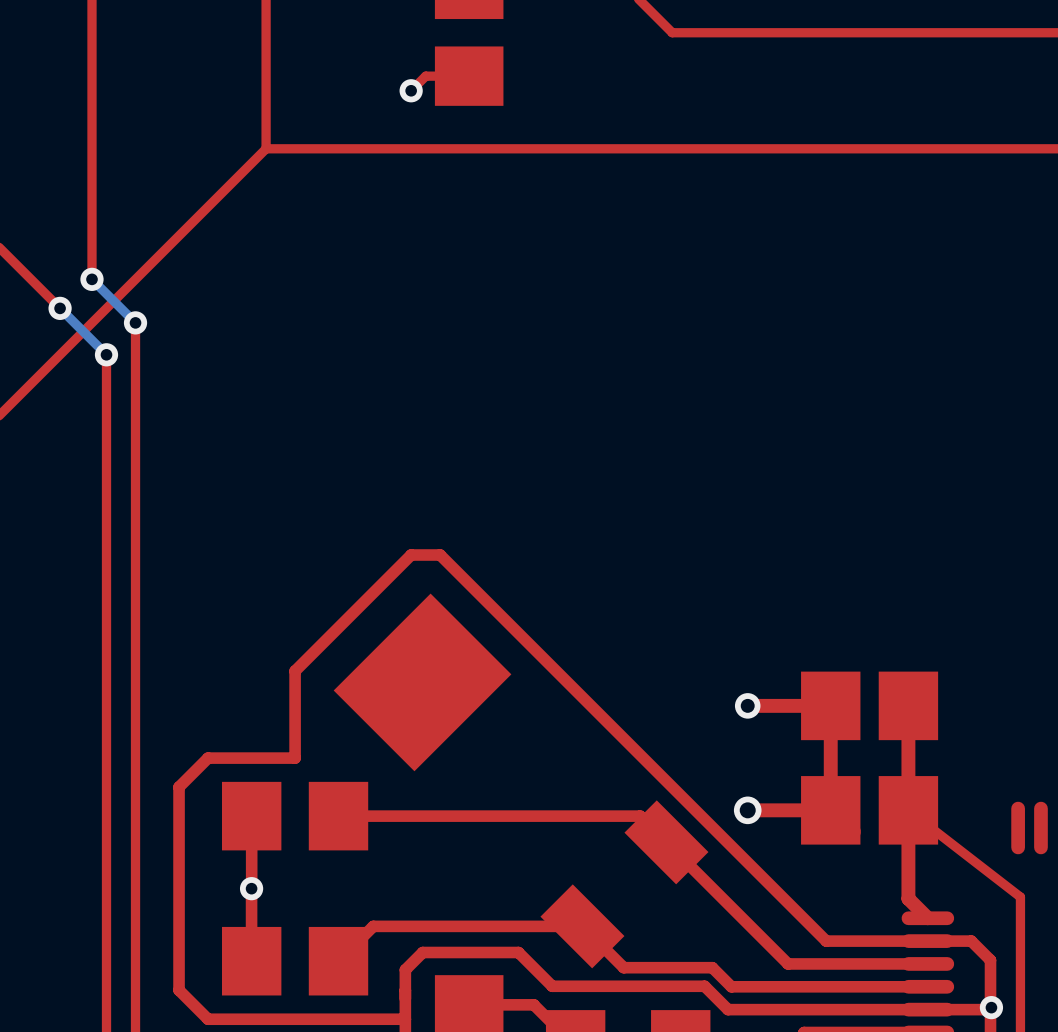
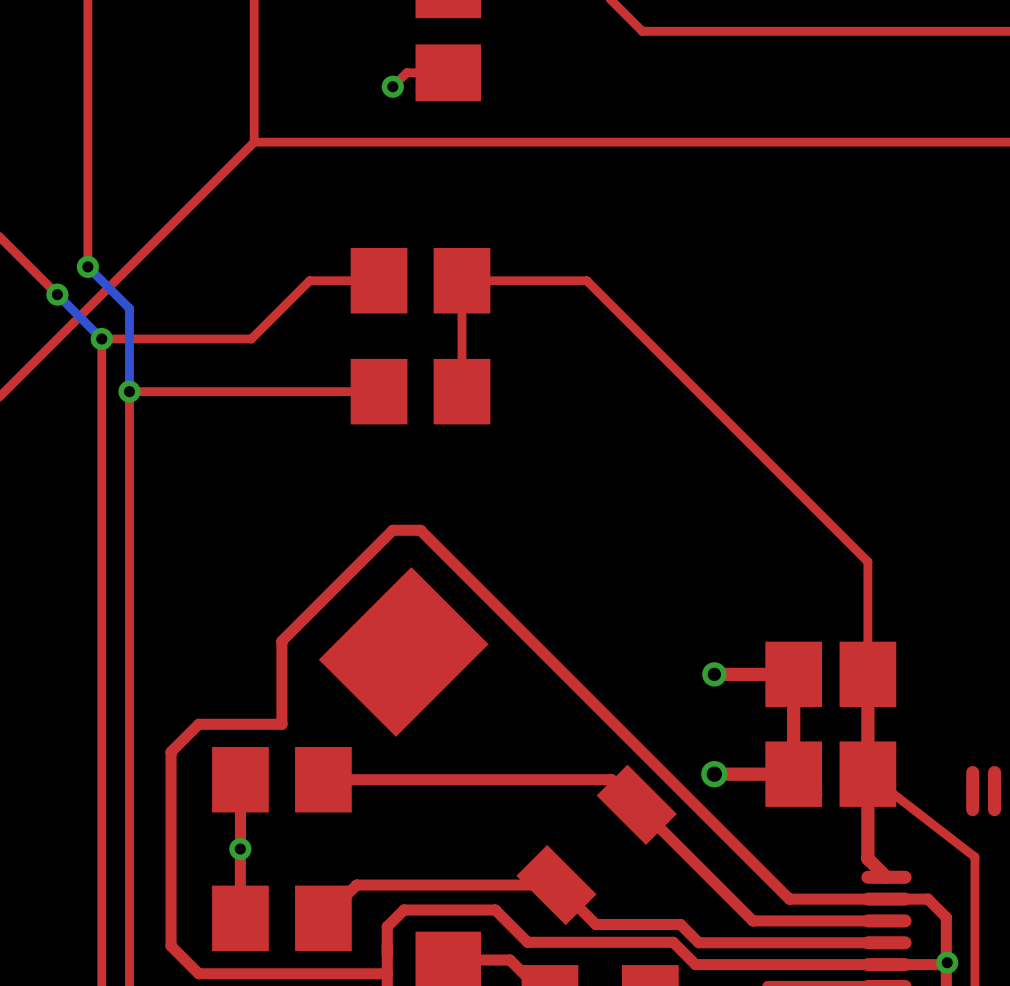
top track: none -> (379, 280) (309, 280) (251, 338) (101, 338)
part: none -> (420, 280)
top track: (135, 322) (135, 409) -> (379, 391) (129, 391)
bottom track: none -> (129, 308) (129, 391)
via position: (135, 322) -> (129, 391)
part: none -> (420, 391)
top track: none -> (462, 391) (462, 280) (586, 280) (867, 561) (867, 674)

